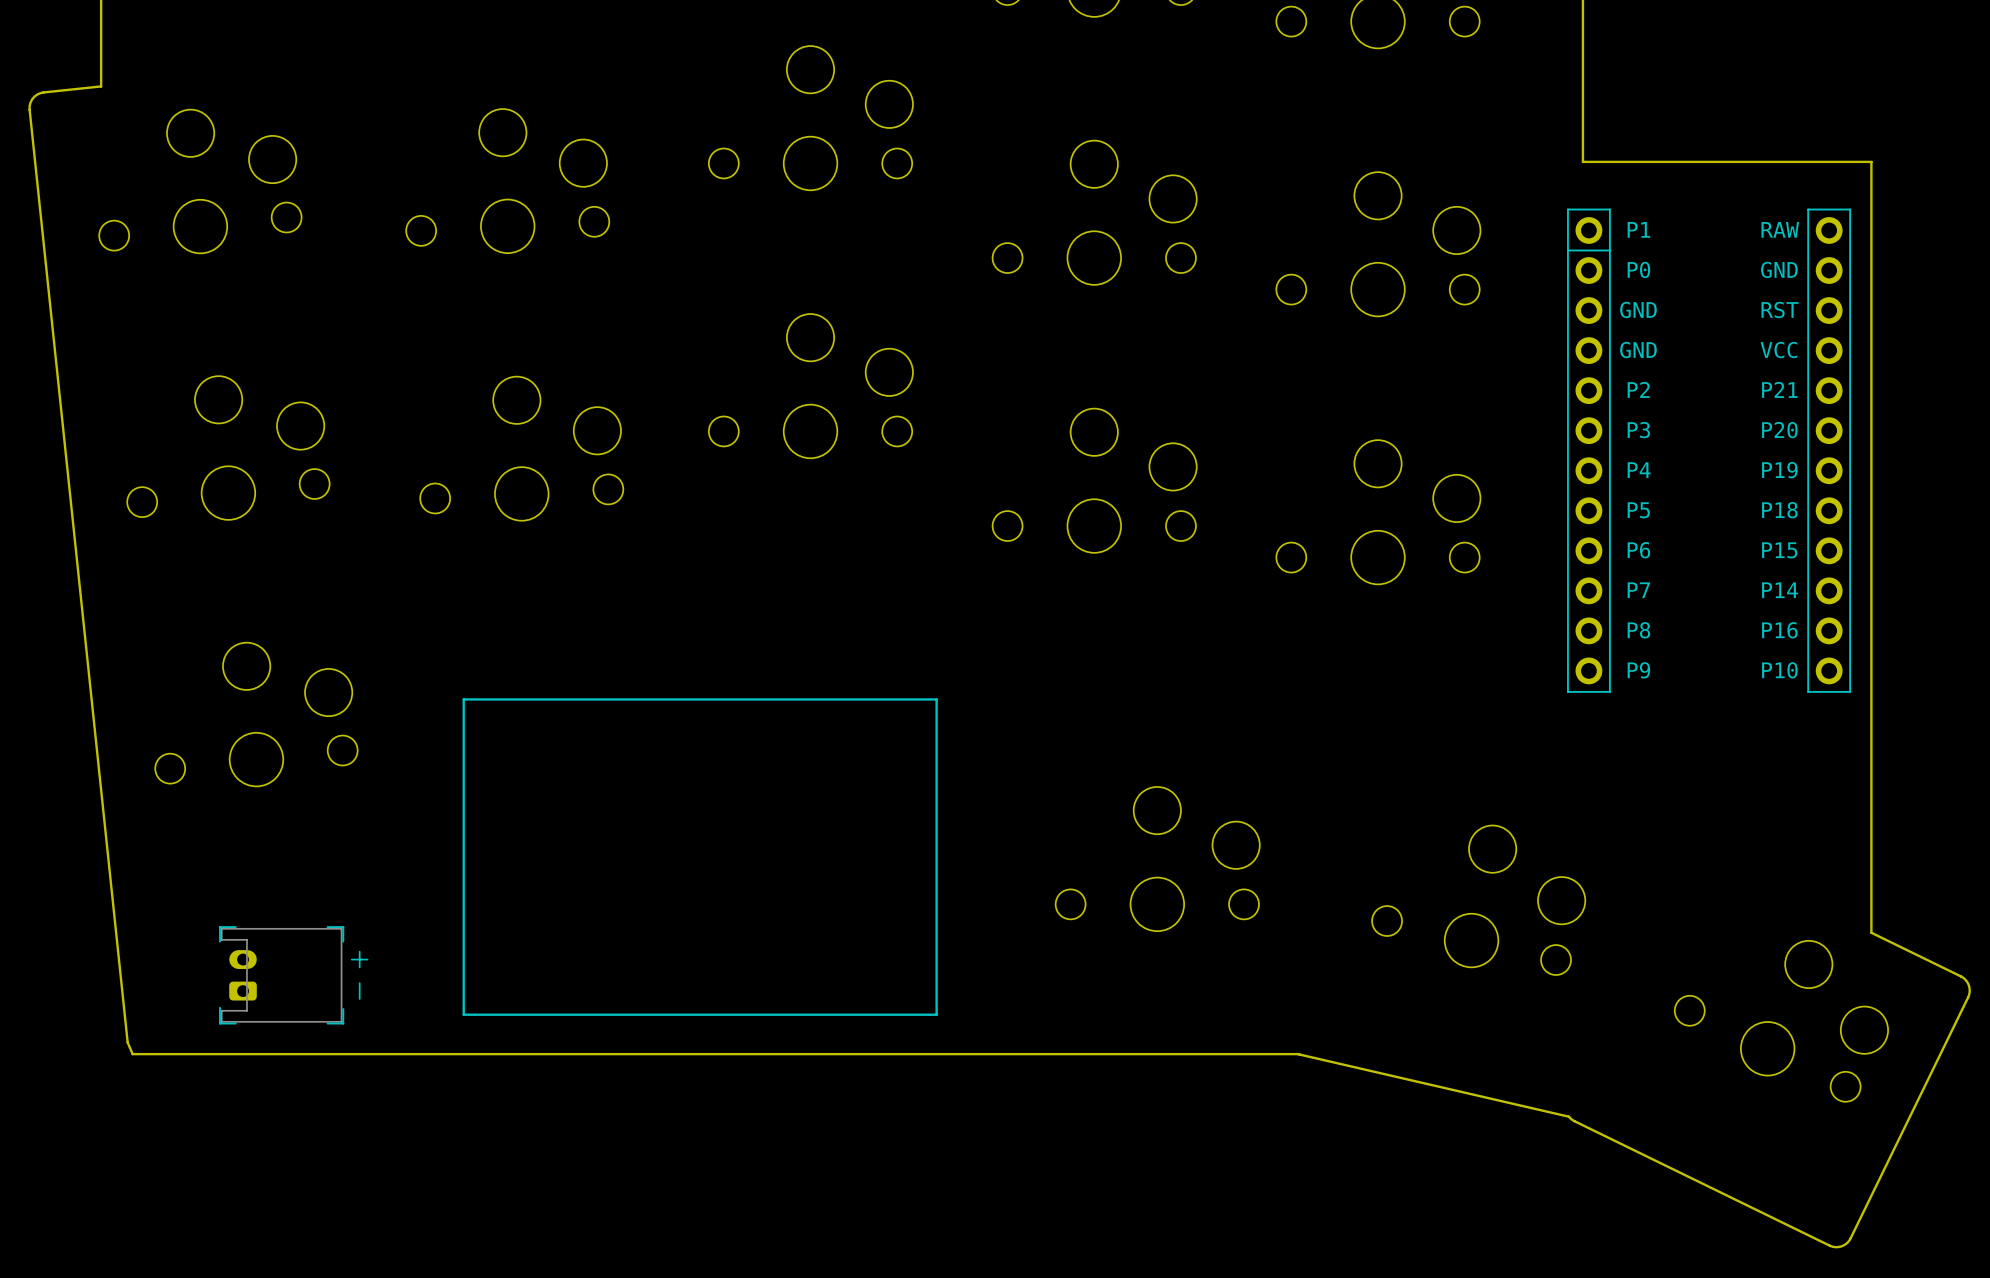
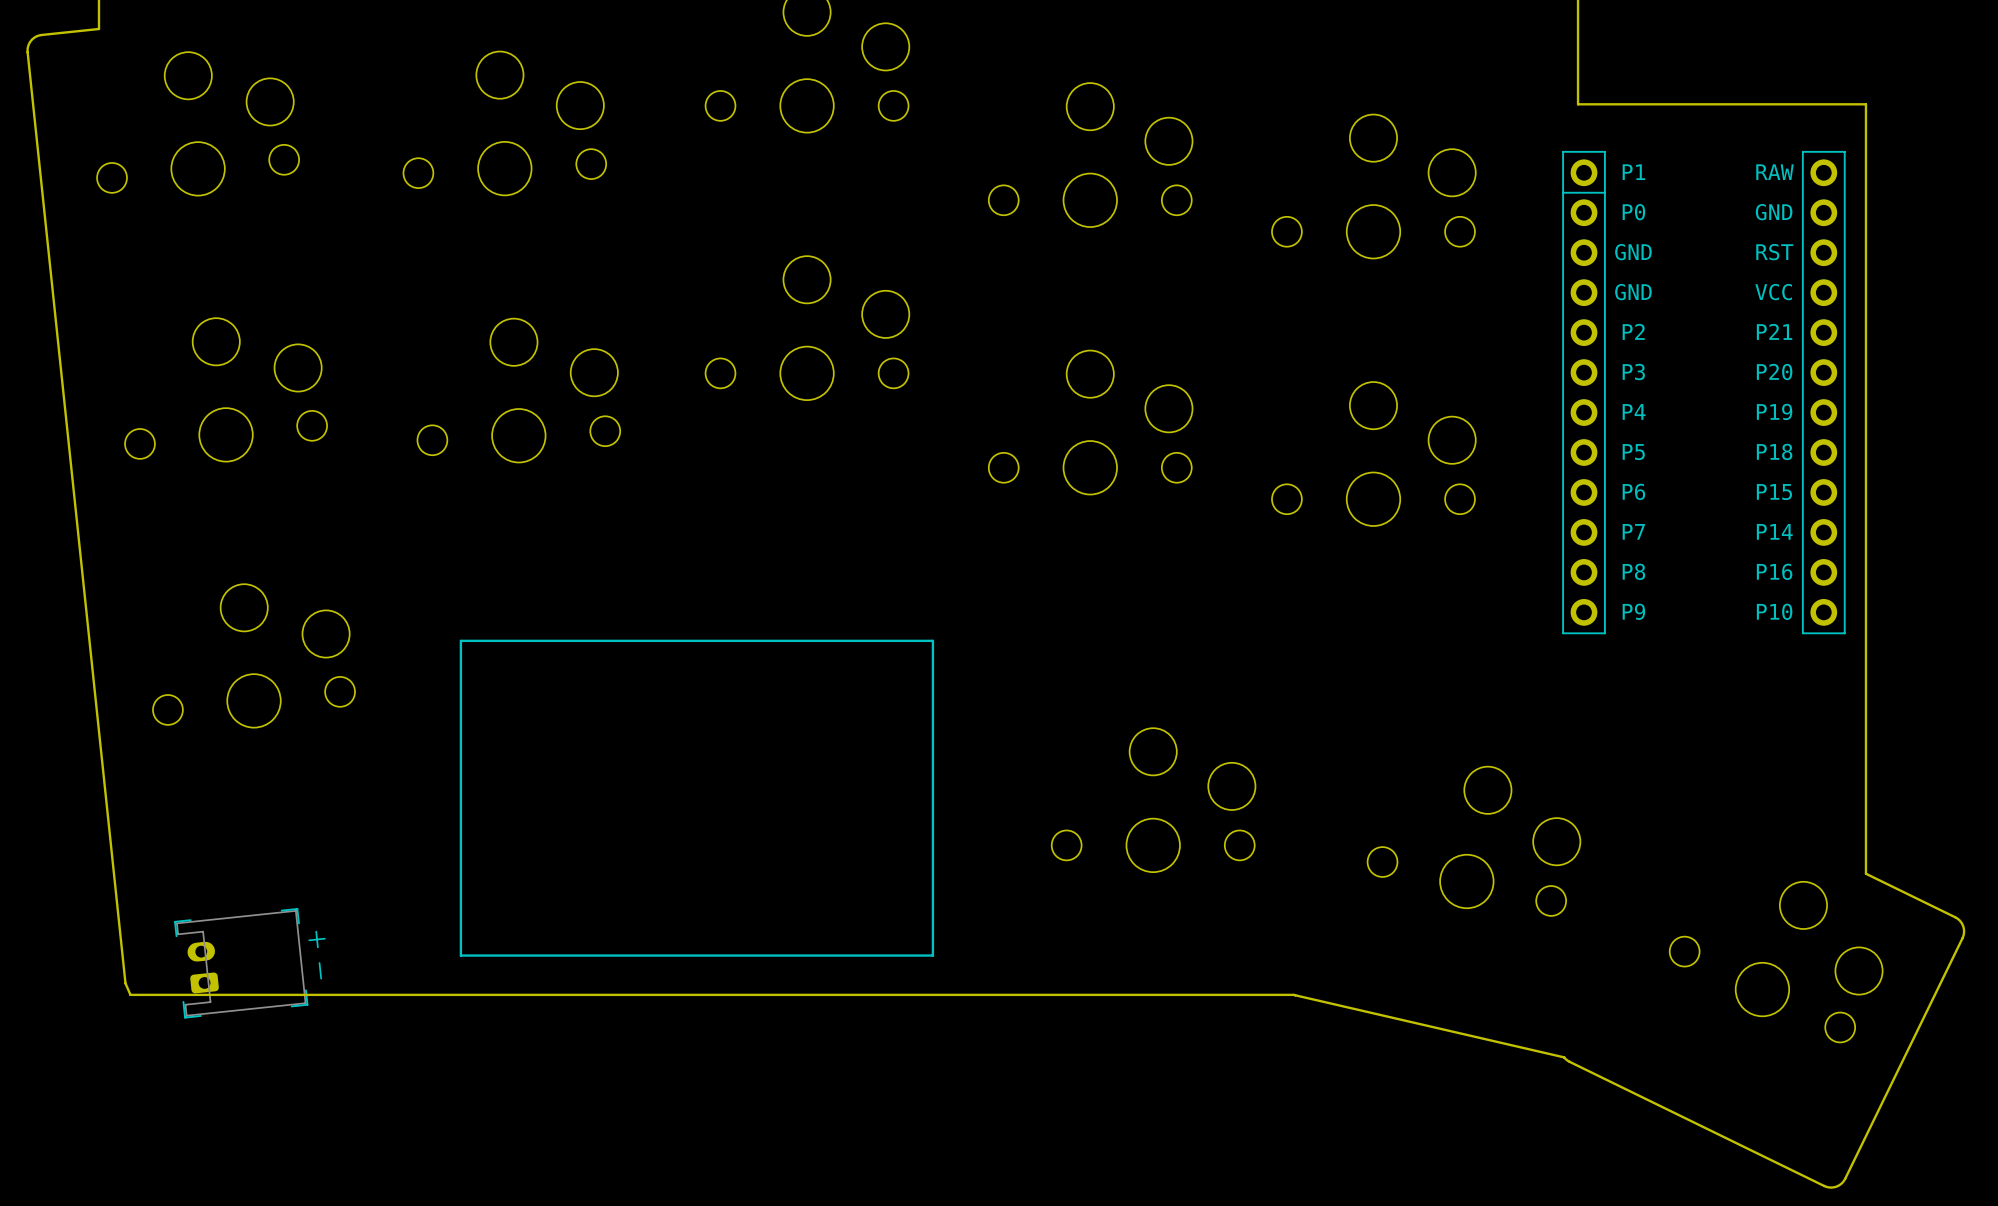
part: (293, 975) -> none
part: none -> (249, 963)

